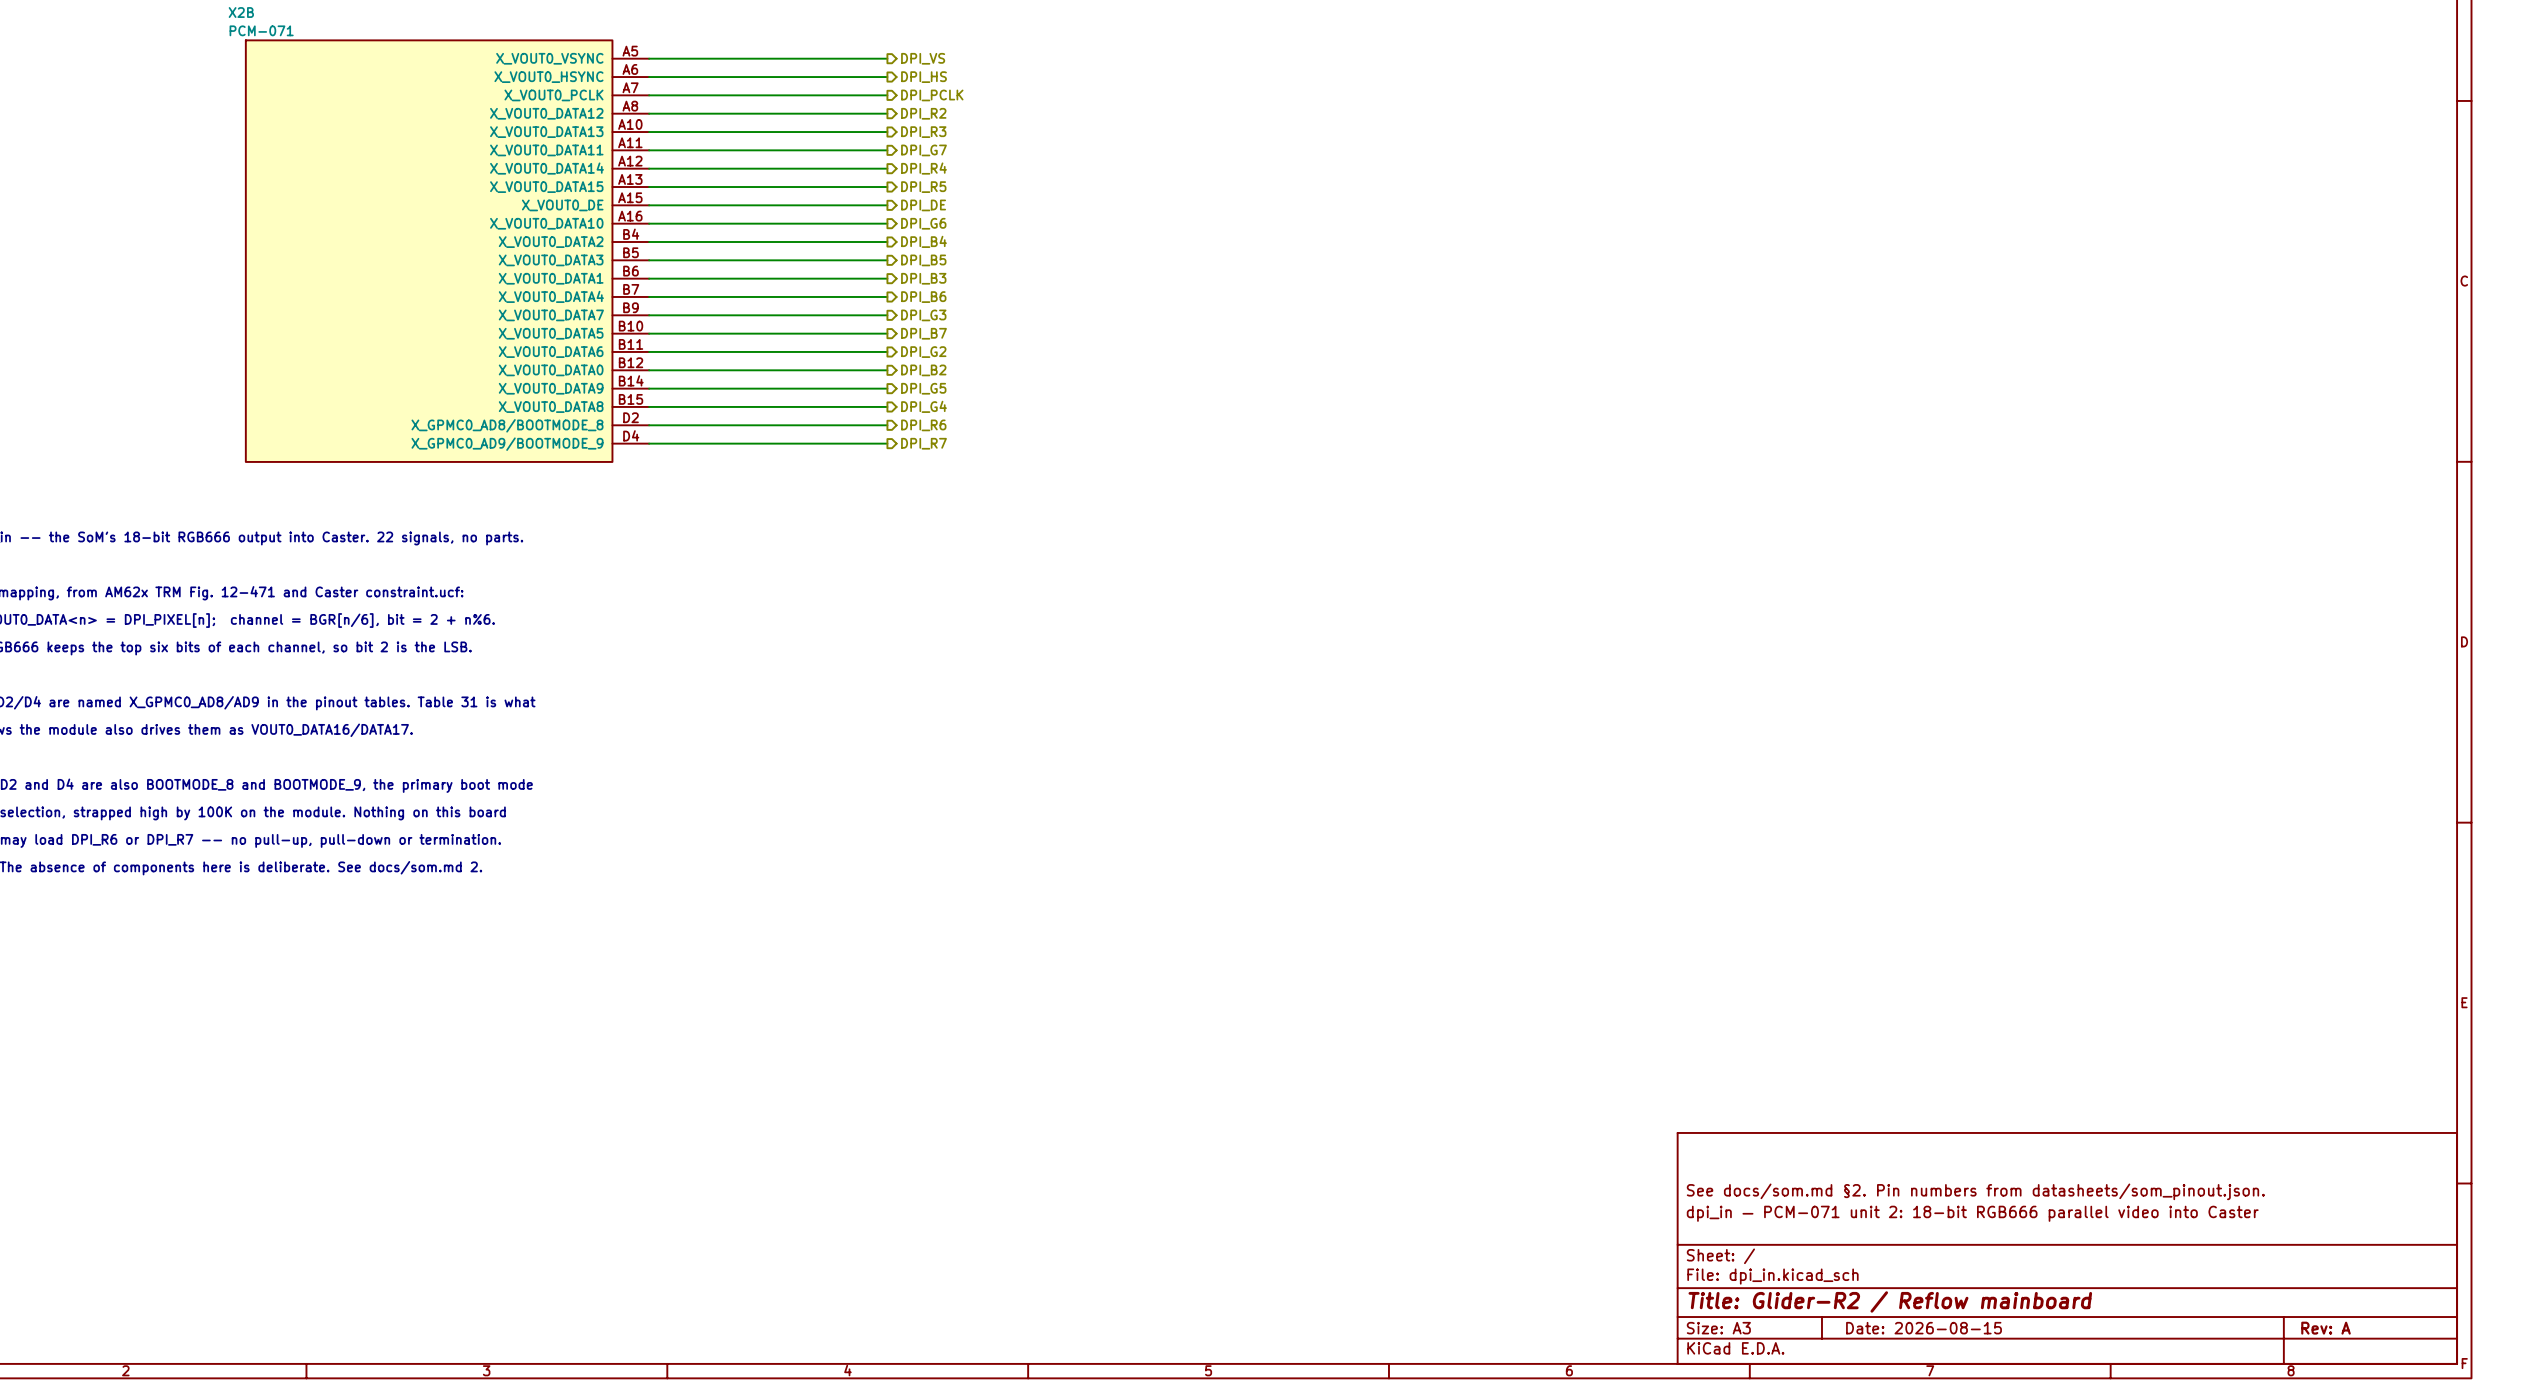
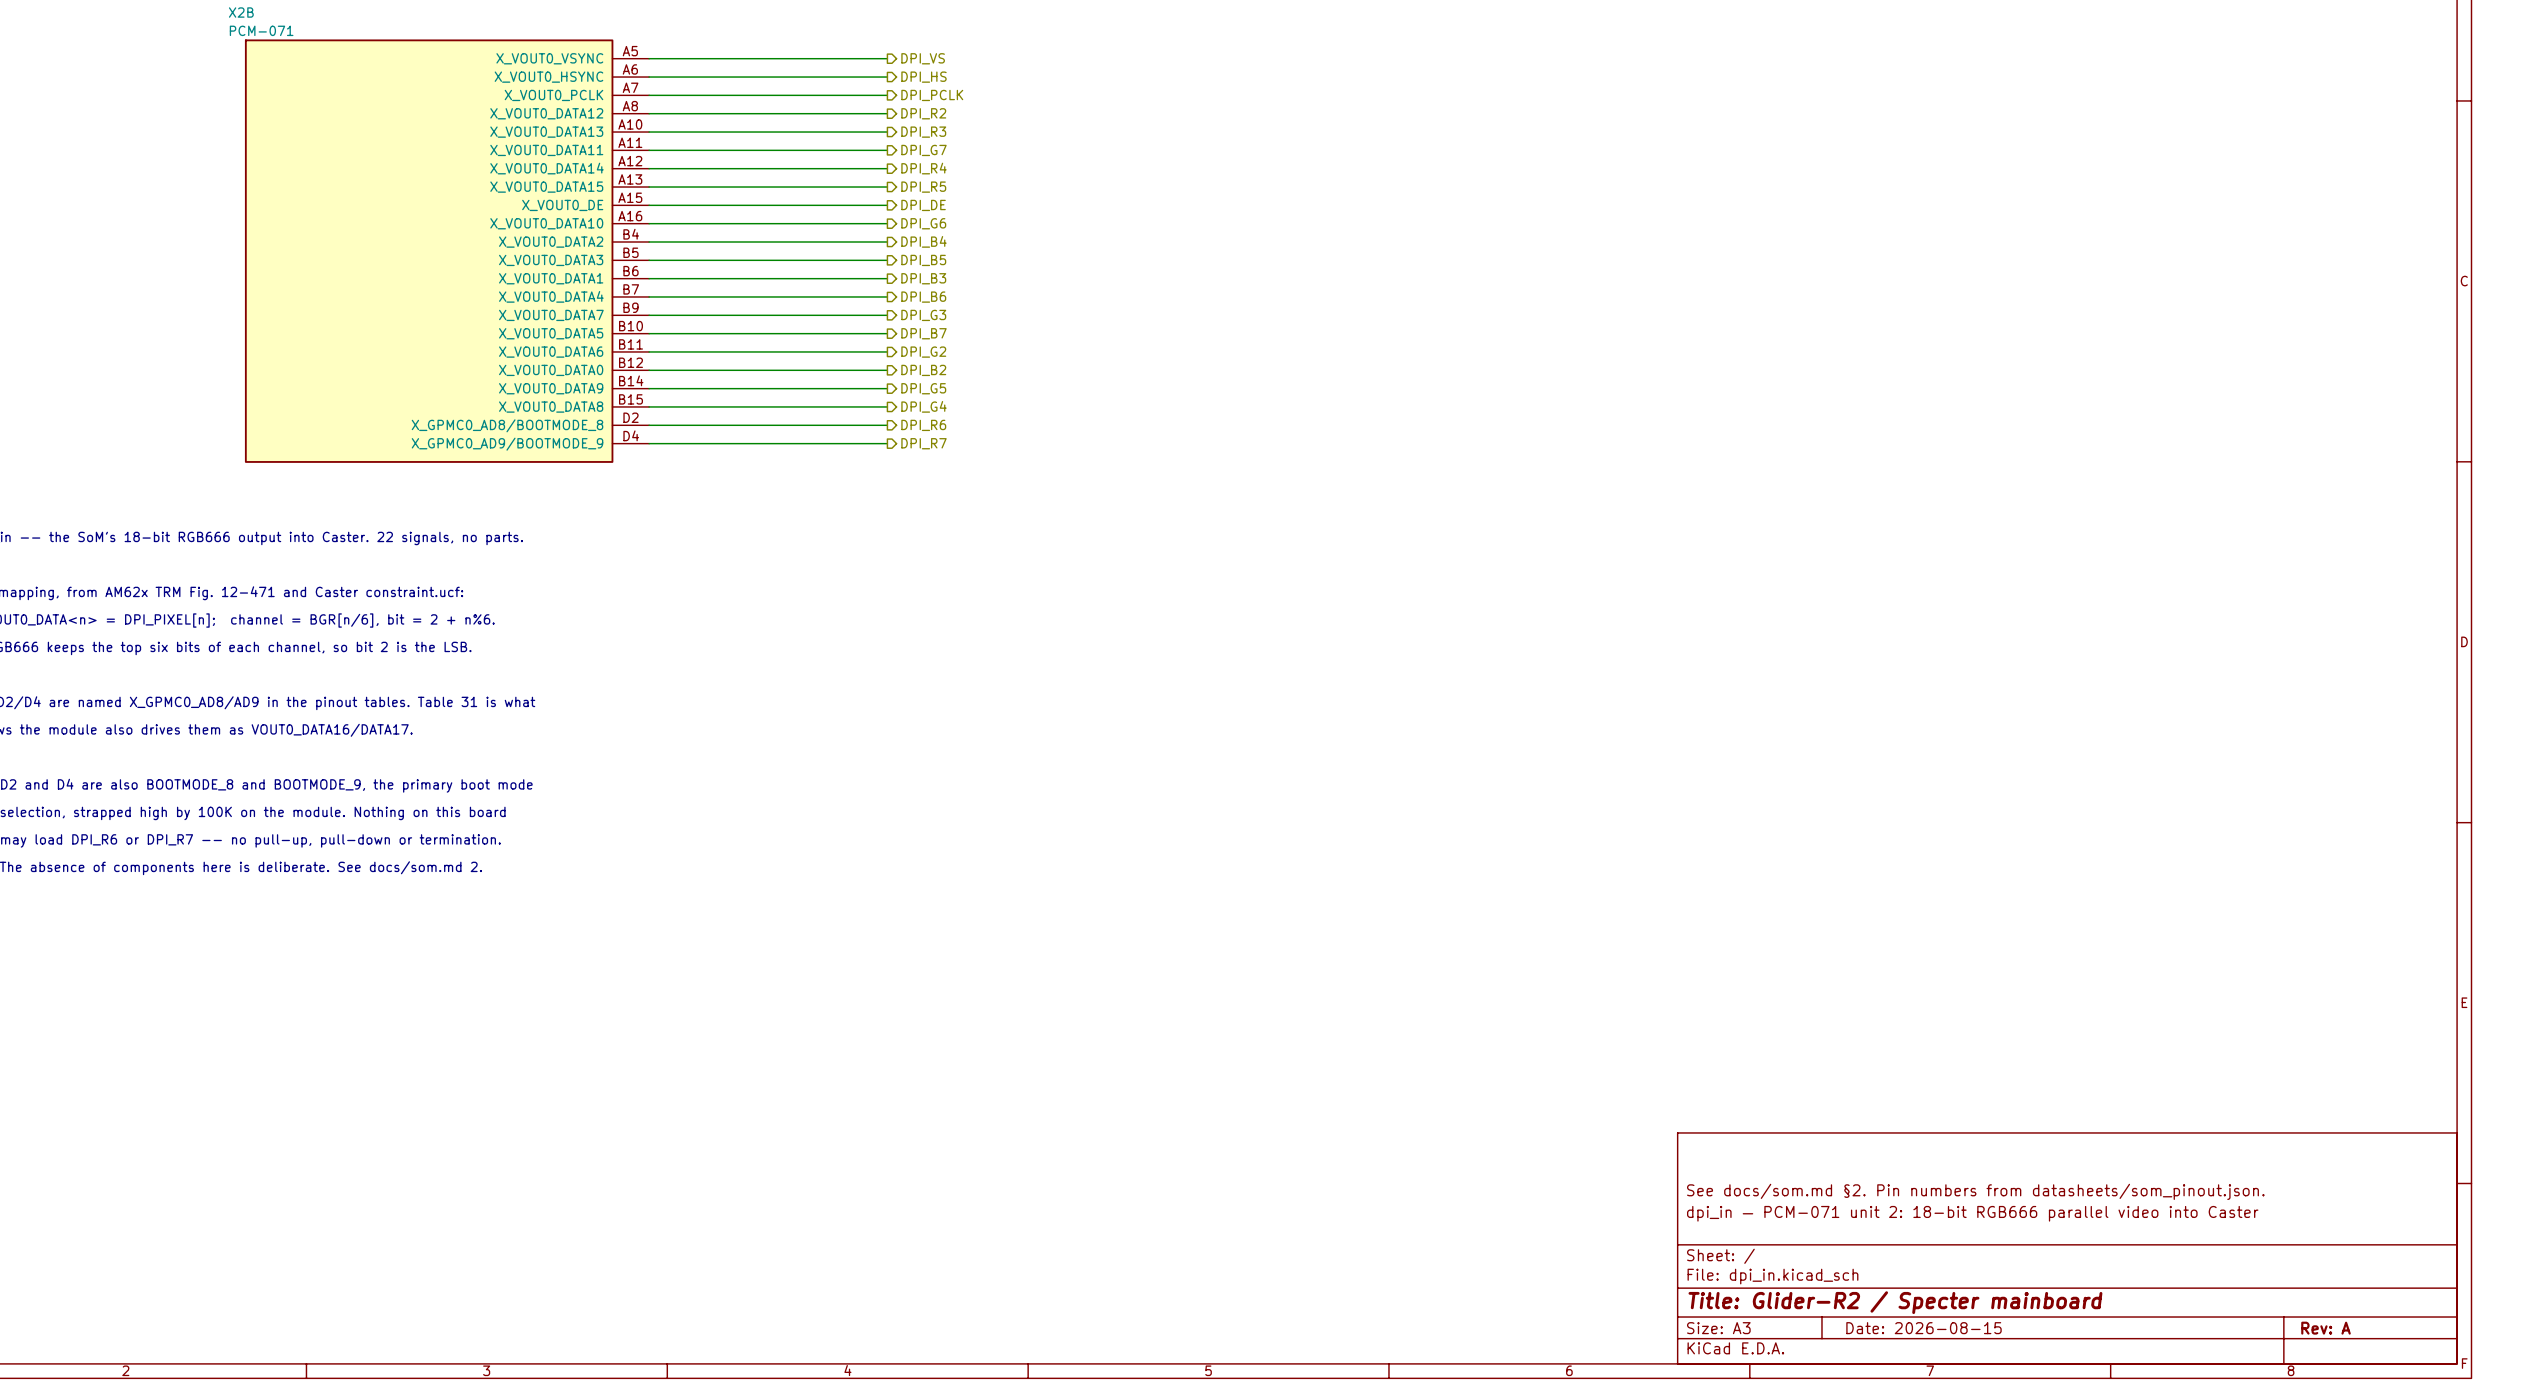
title block: Title: Glider-R2 / Reflow mainboard (1890, 1301) -> Title: Glider-R2 / Specter mainboard (1895, 1302)

